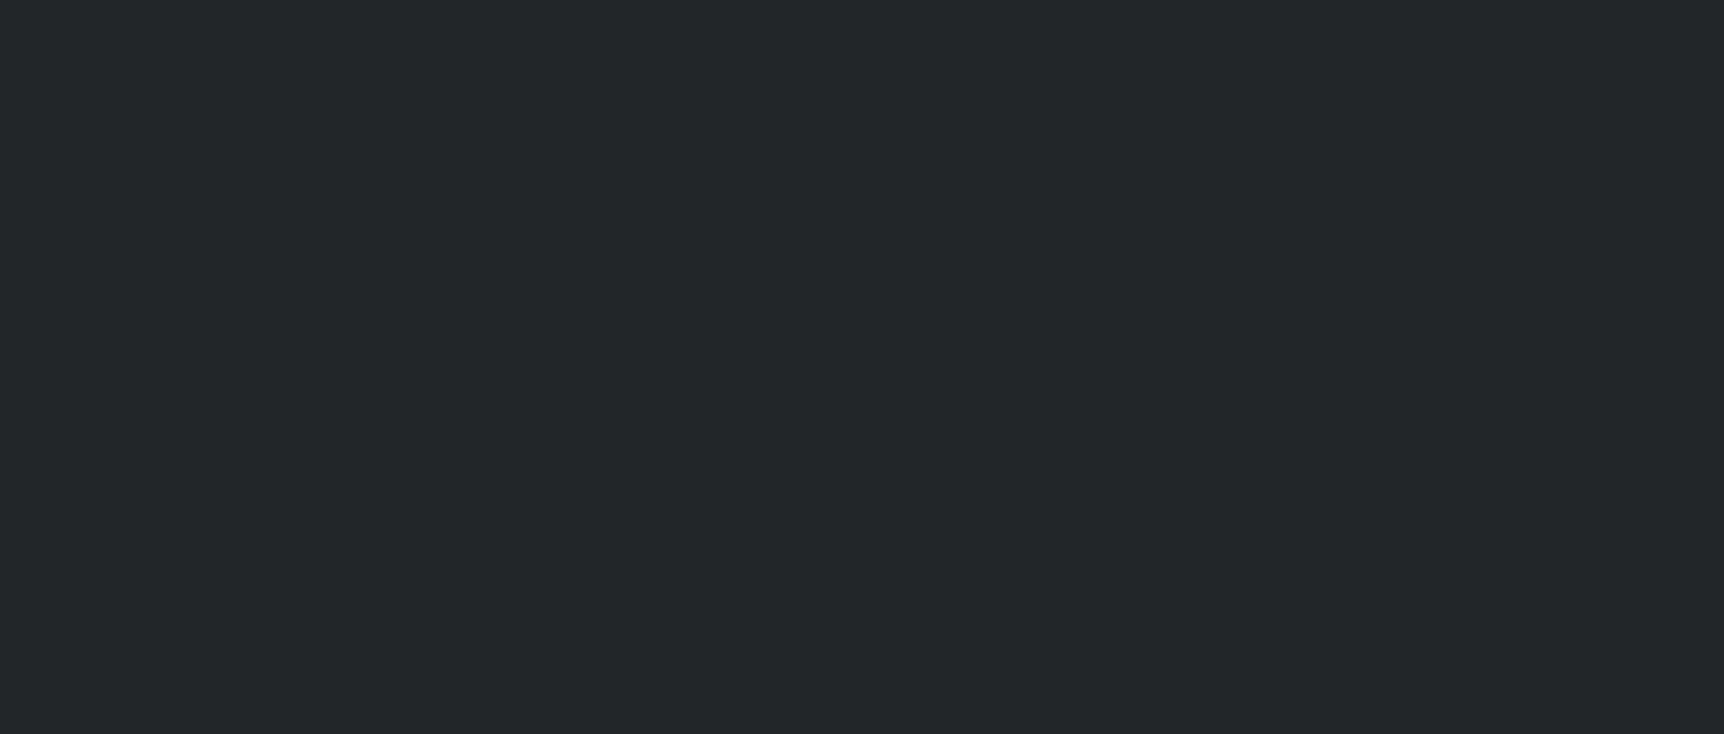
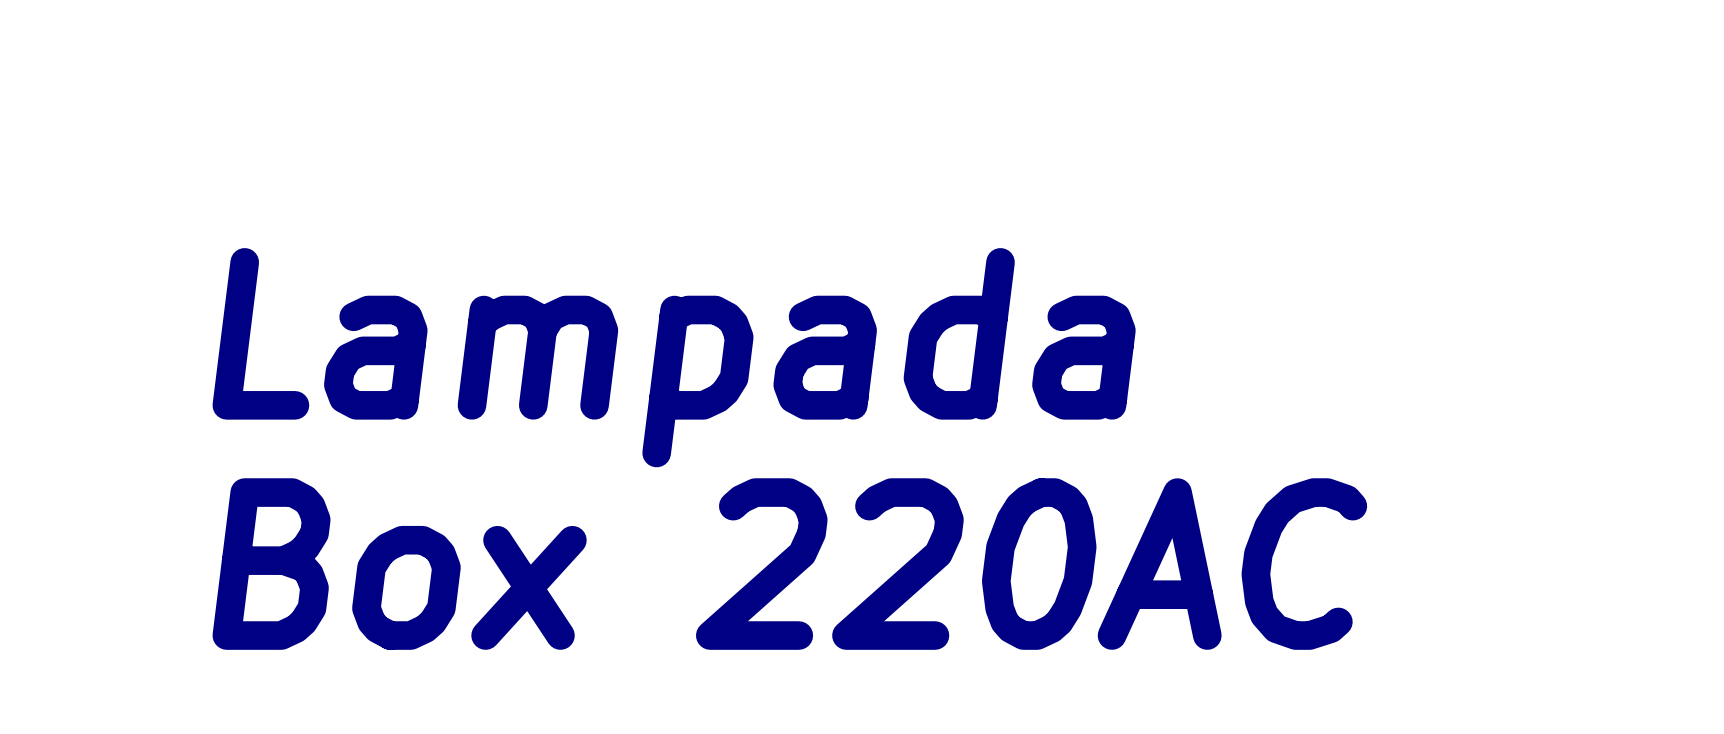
text: none -> Lampada (674, 357)
text: none -> Box 220AC (789, 564)

